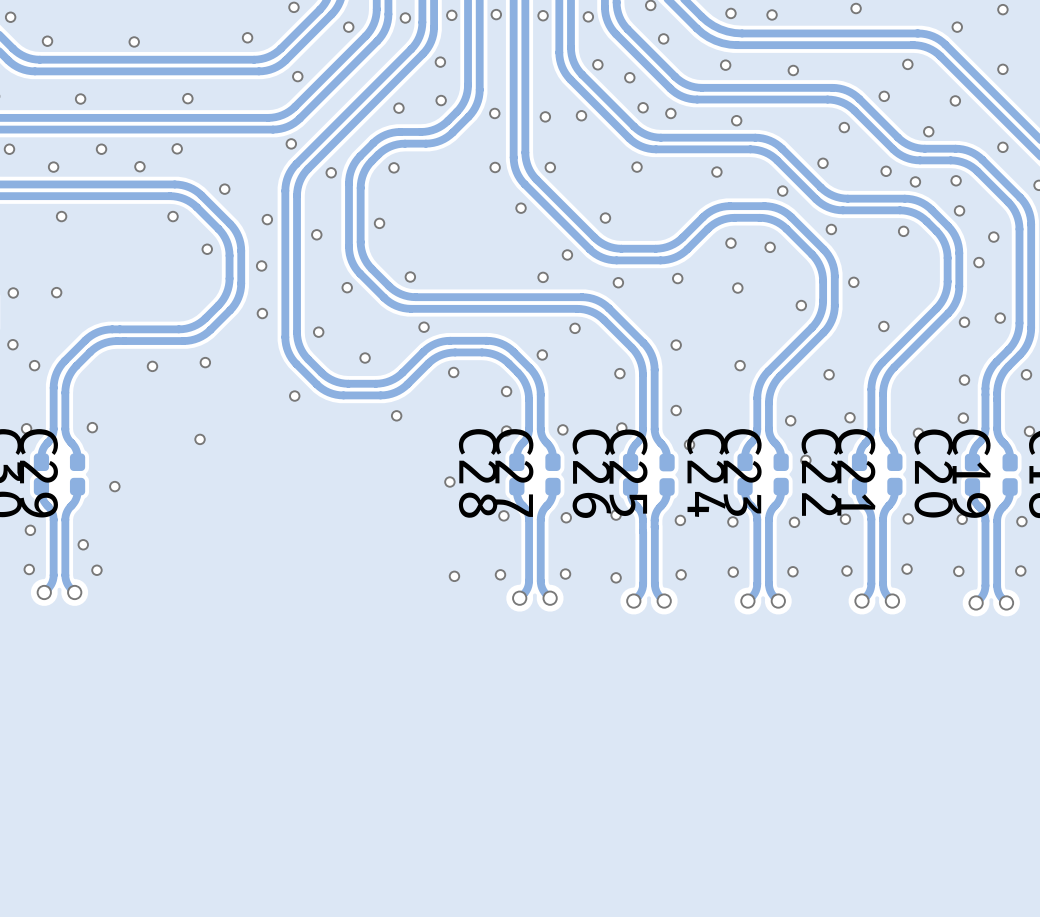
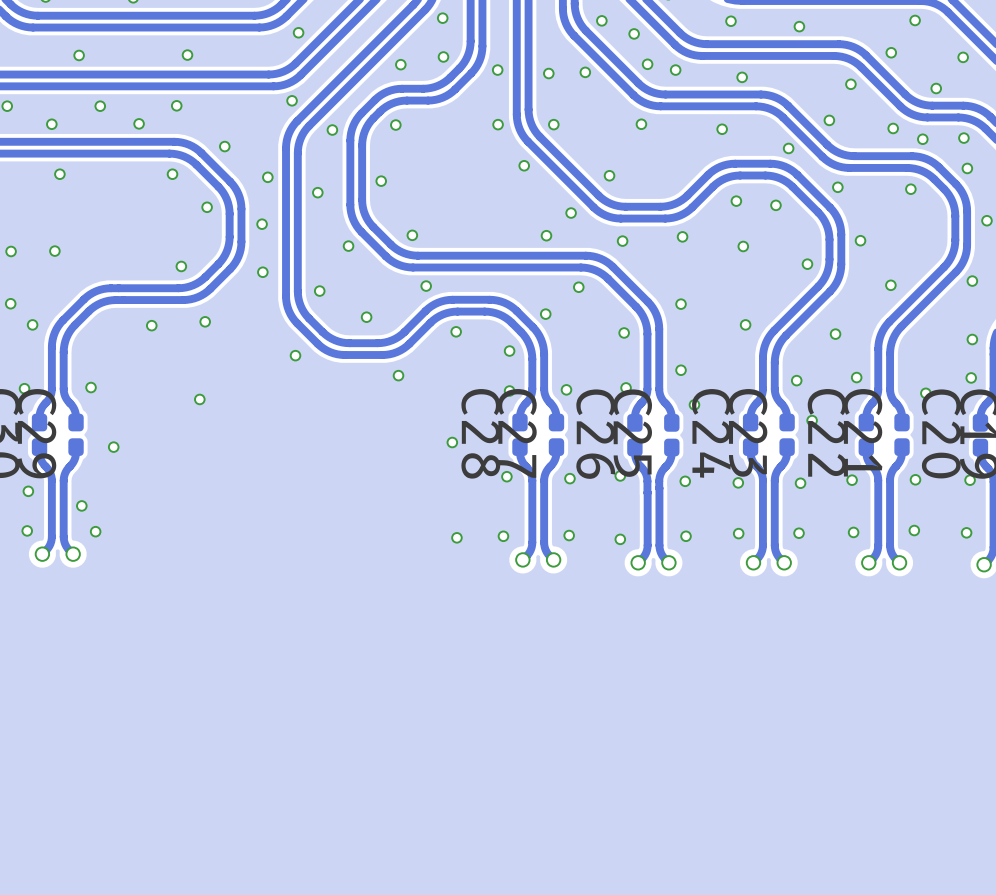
via: none -> (181, 266)

